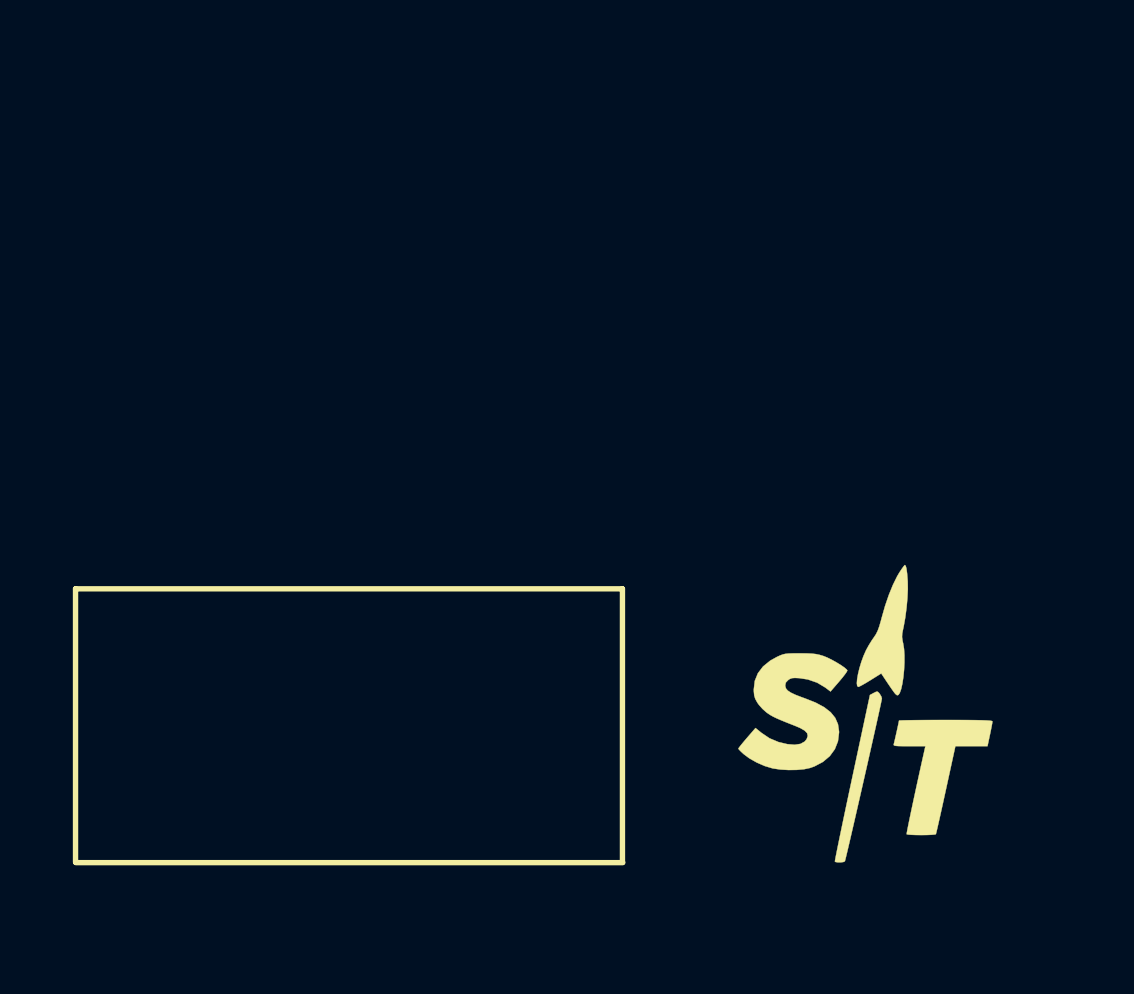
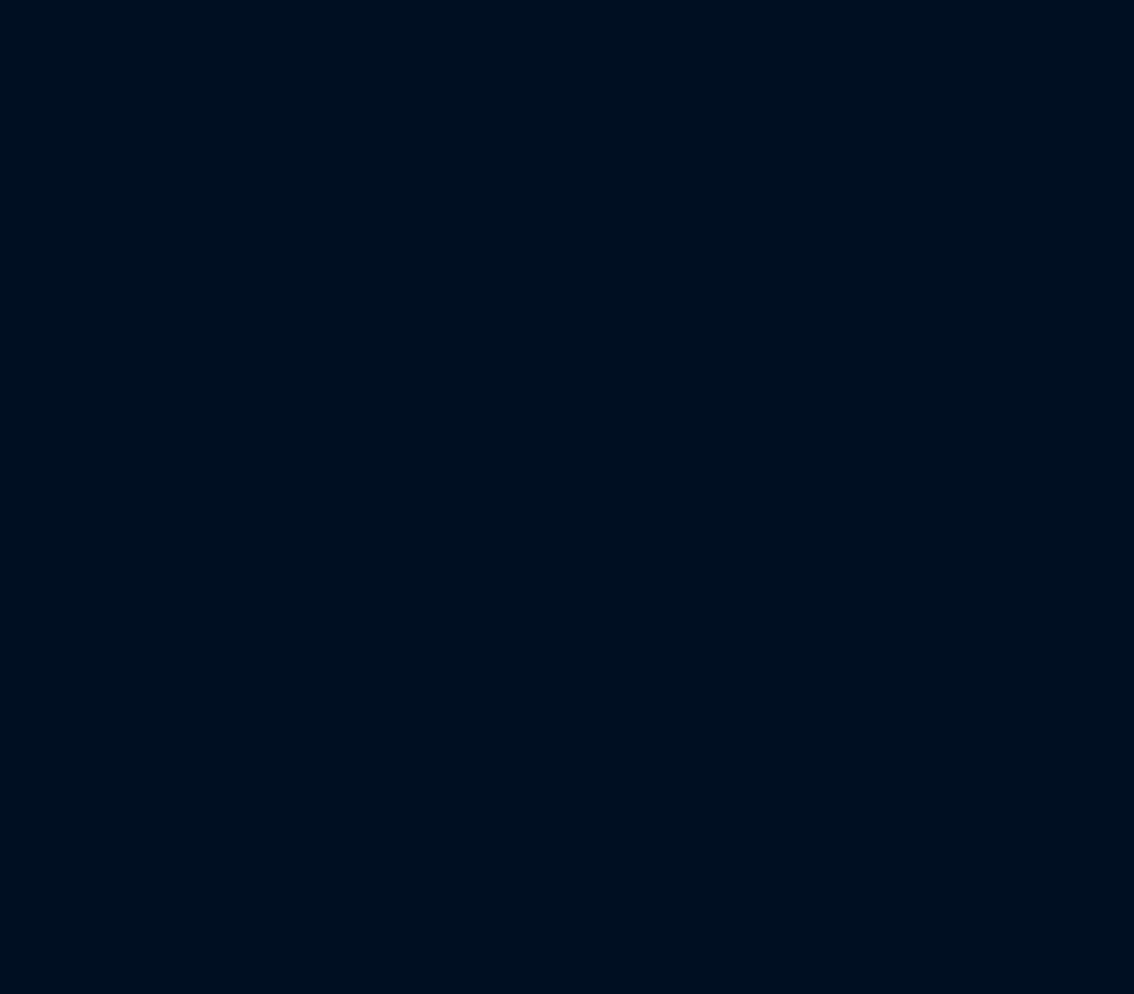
drawing: [738, 564, 993, 863] -> none
line: (75, 862) (75, 588) (622, 588) (622, 862) -> none
line: (75, 862) (622, 862) -> none

